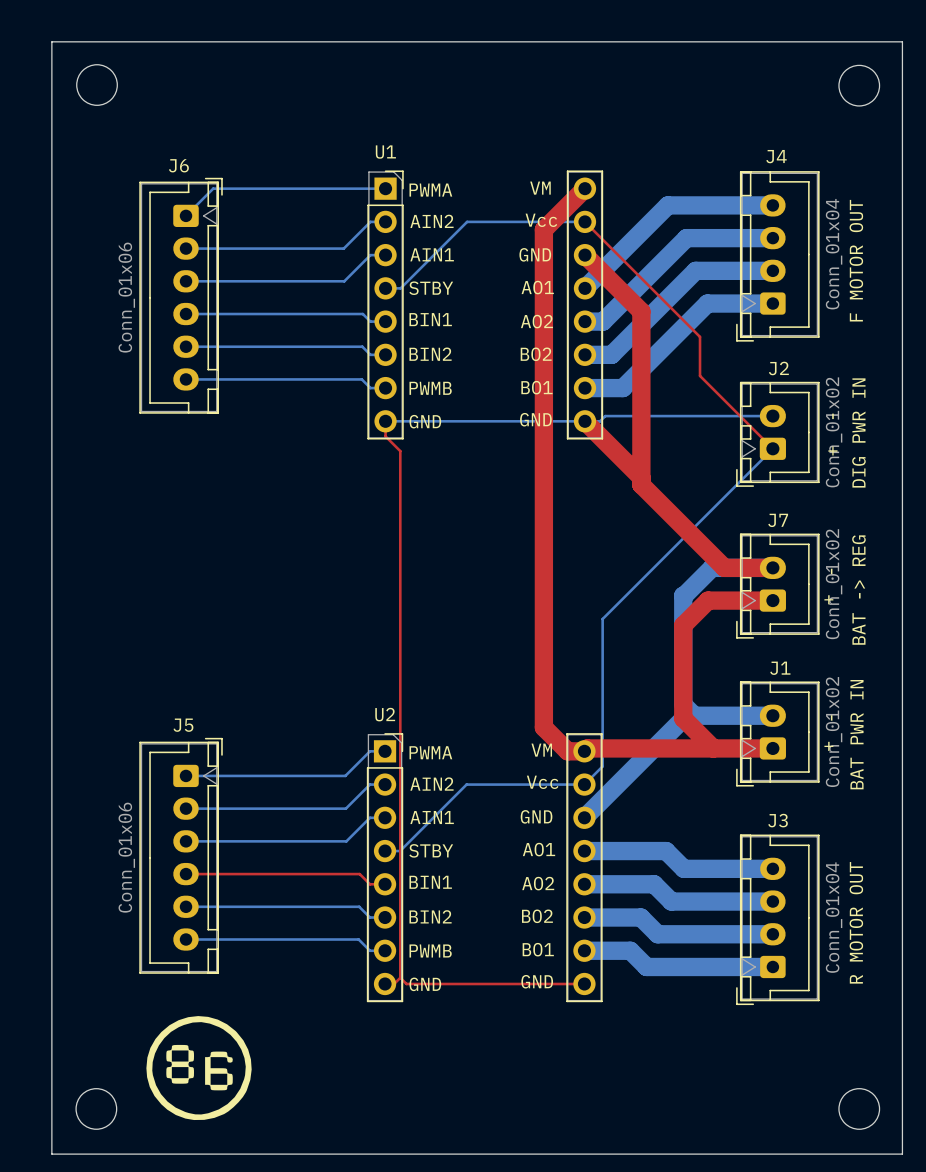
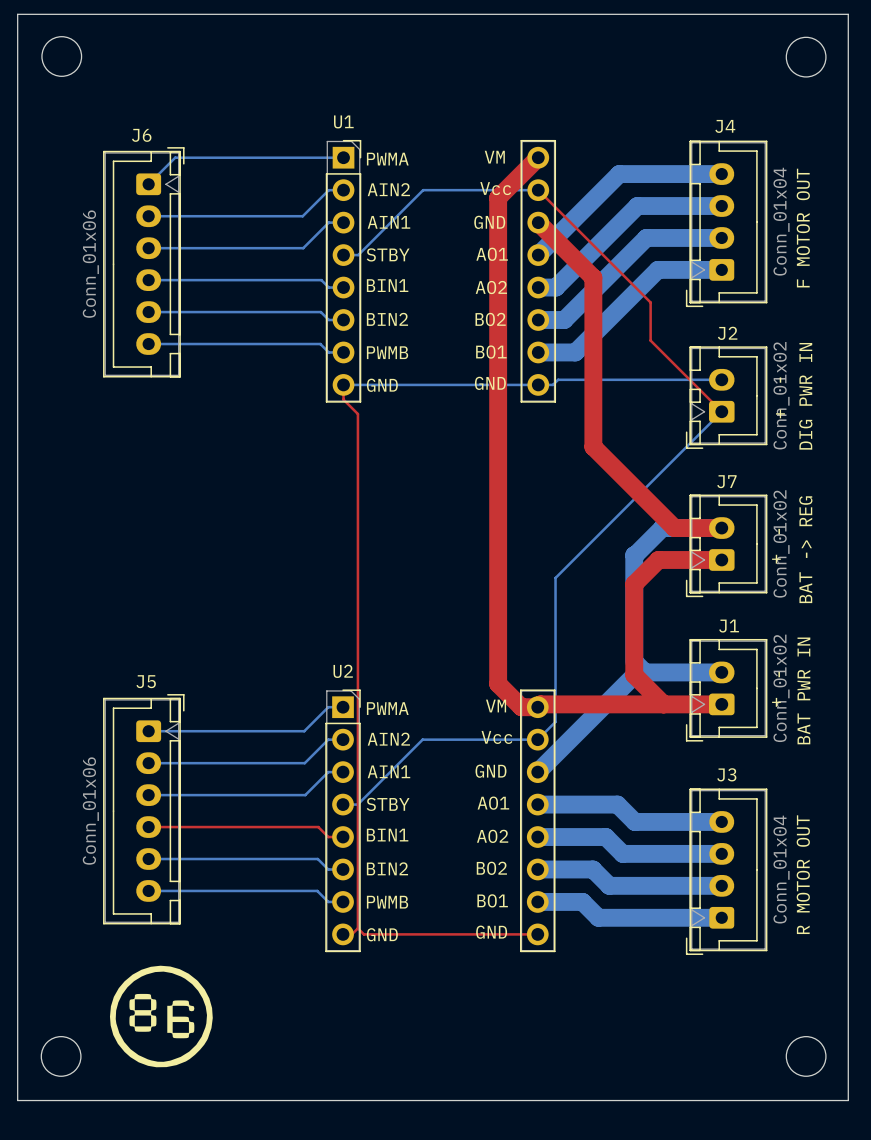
top track: (584, 421) (641, 477) -> none

